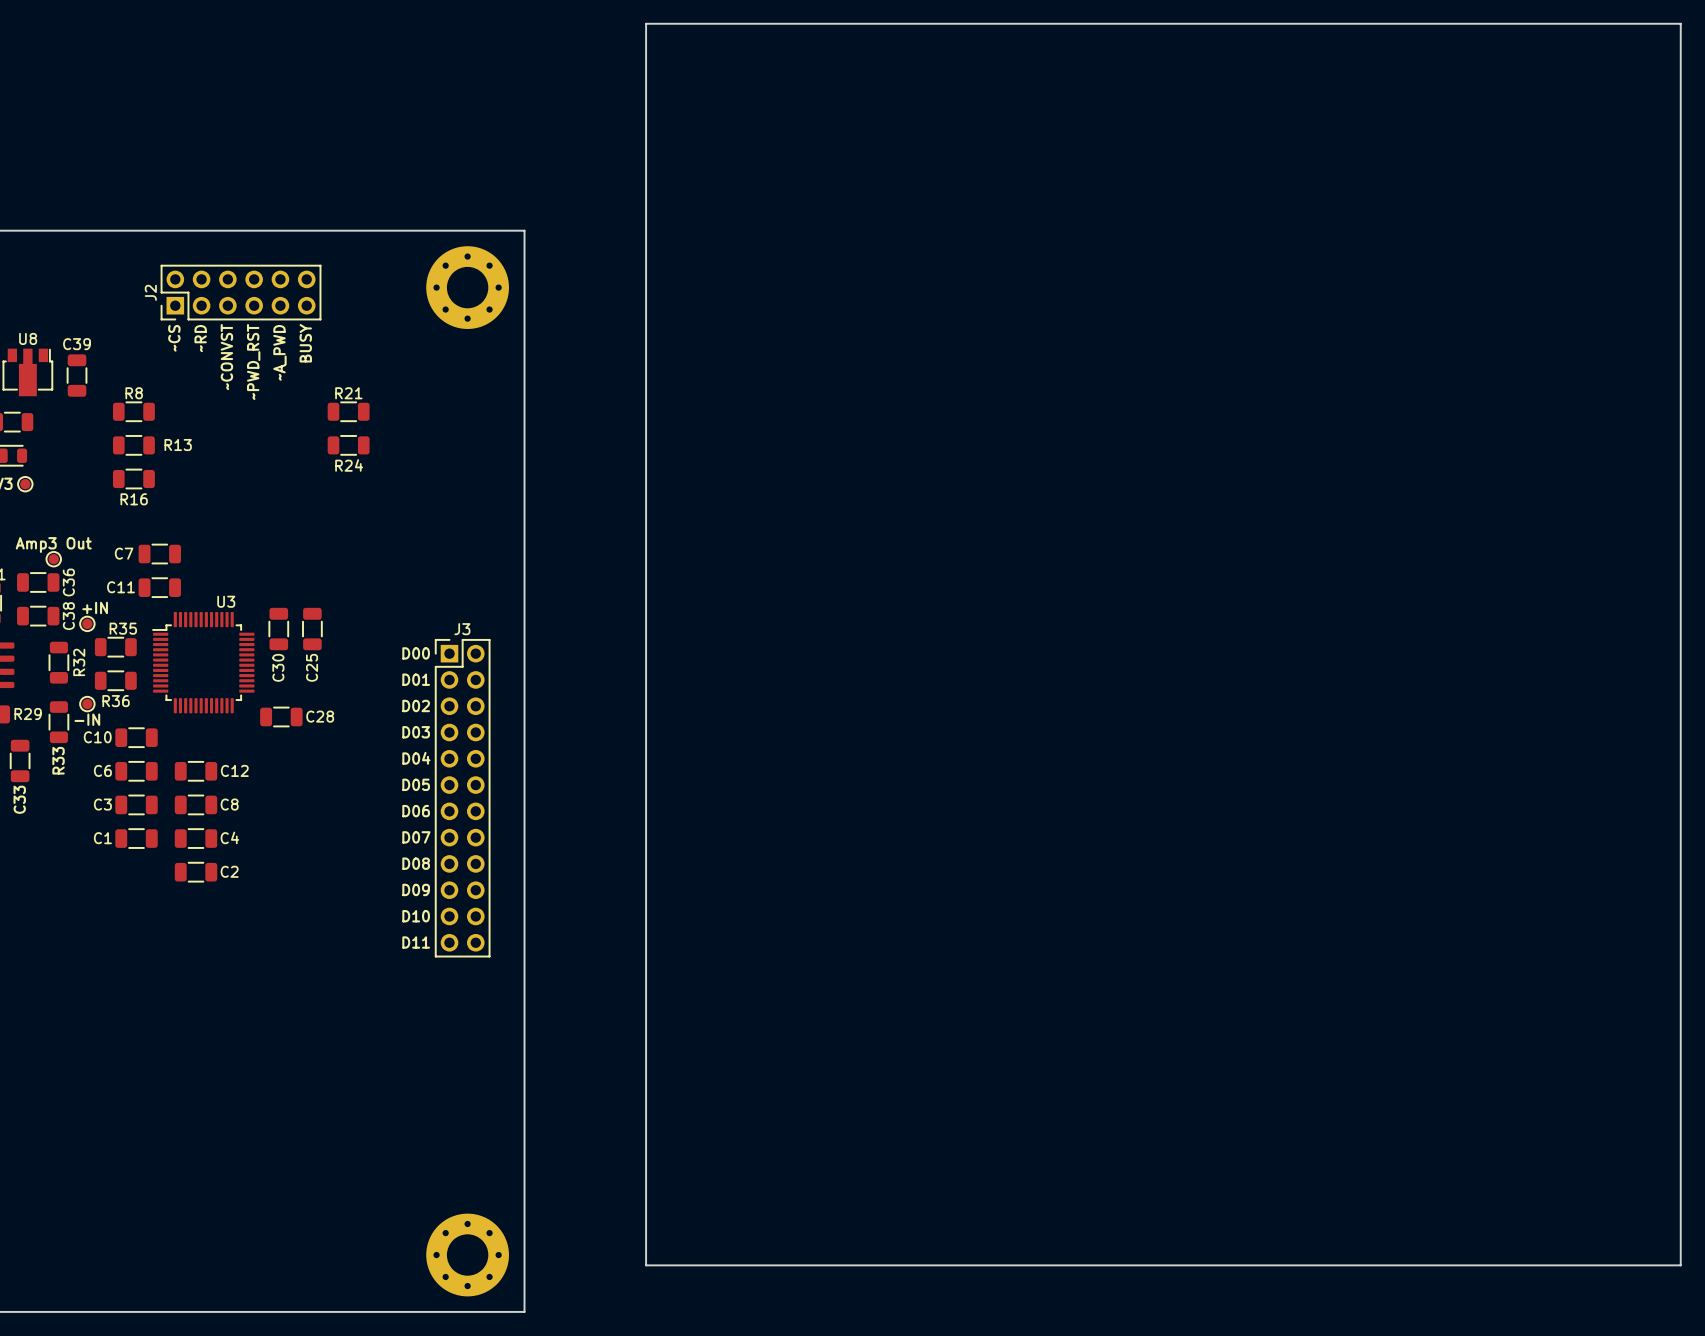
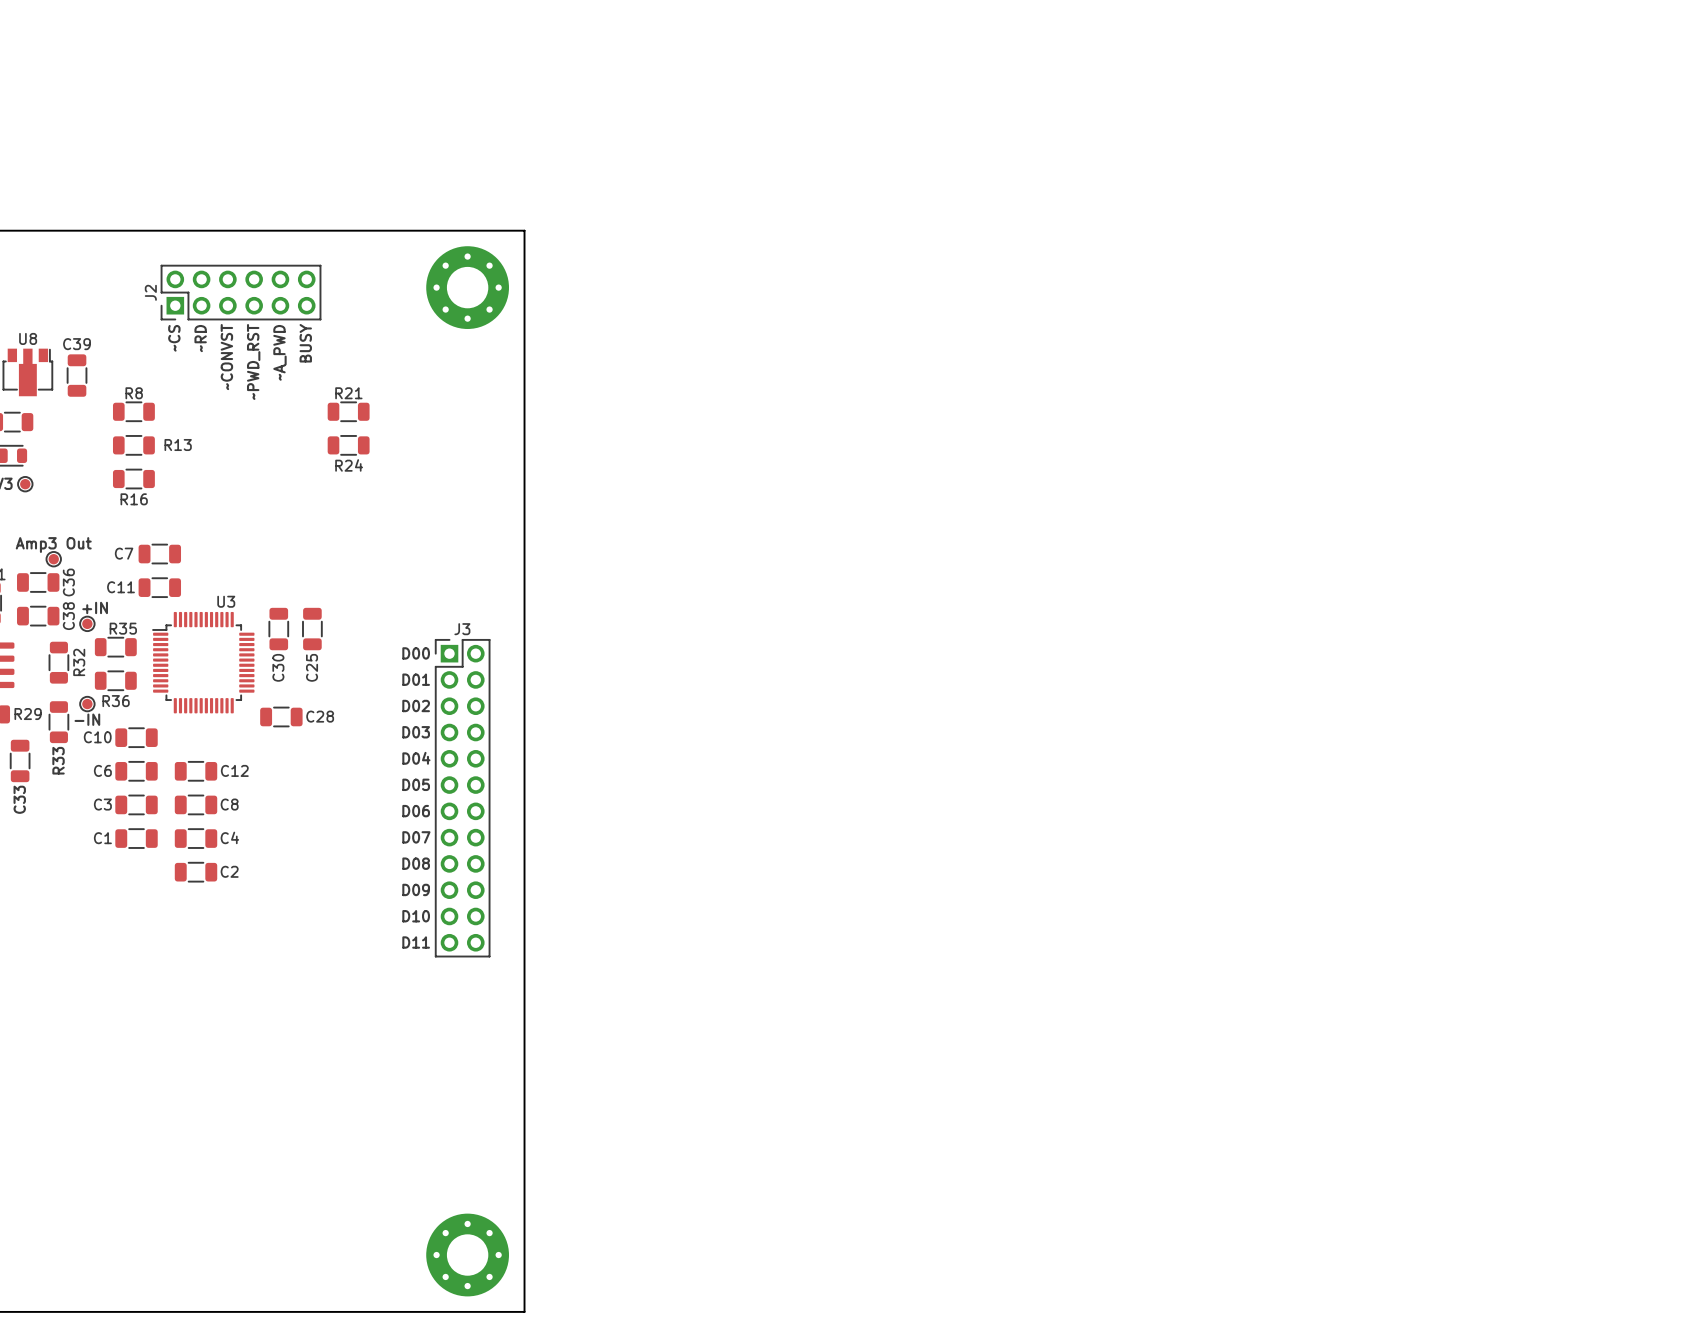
board edge: (646, 23) (1680, 23) (1680, 1265) (646, 1265) (646, 23) -> none

